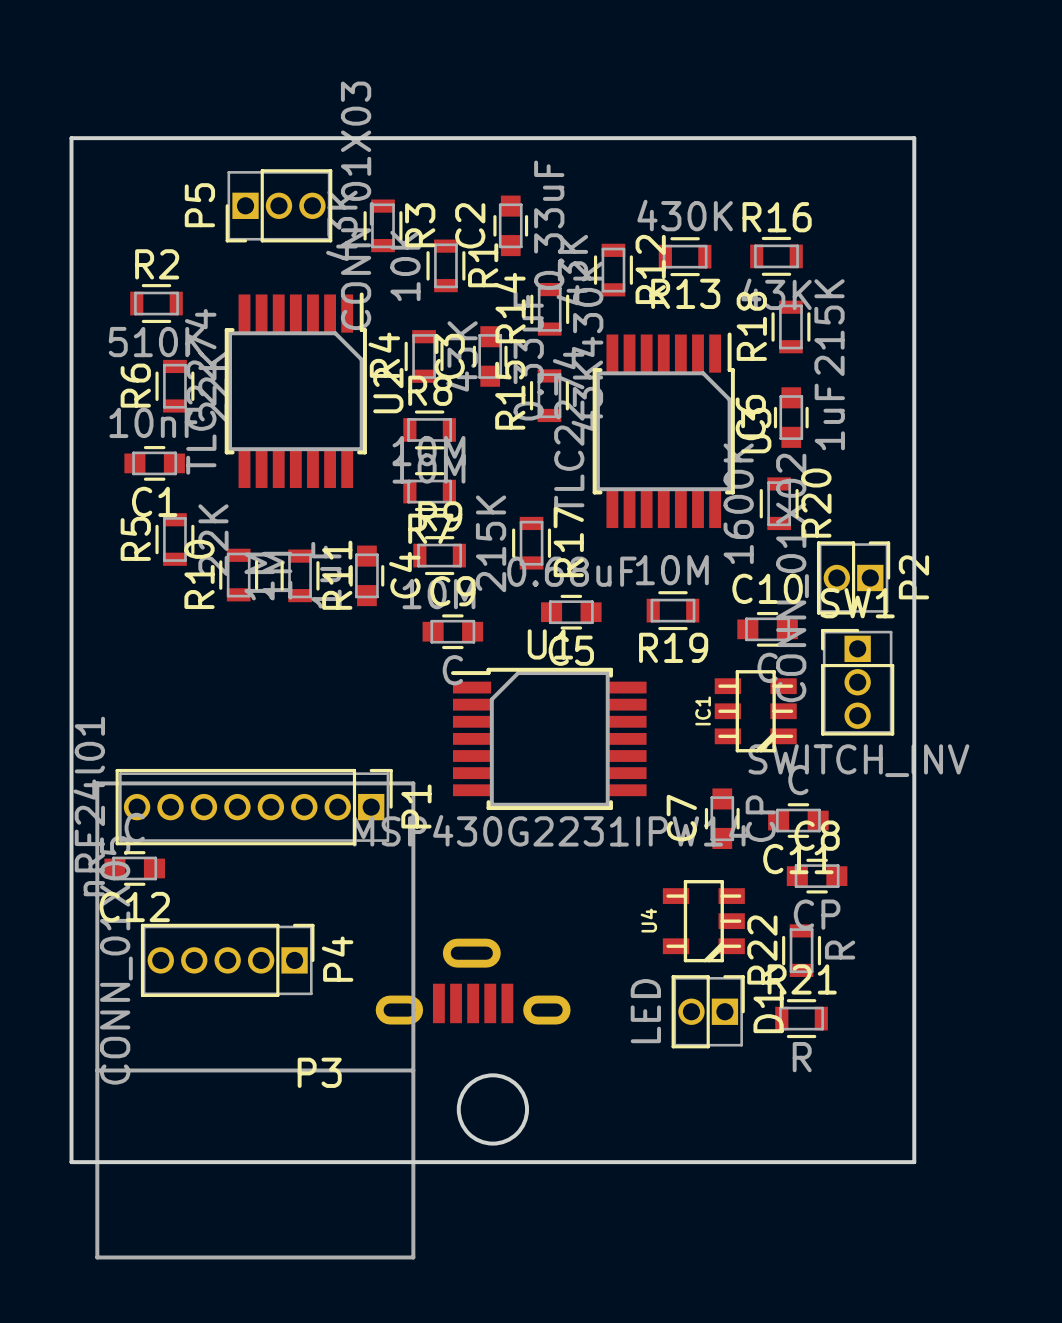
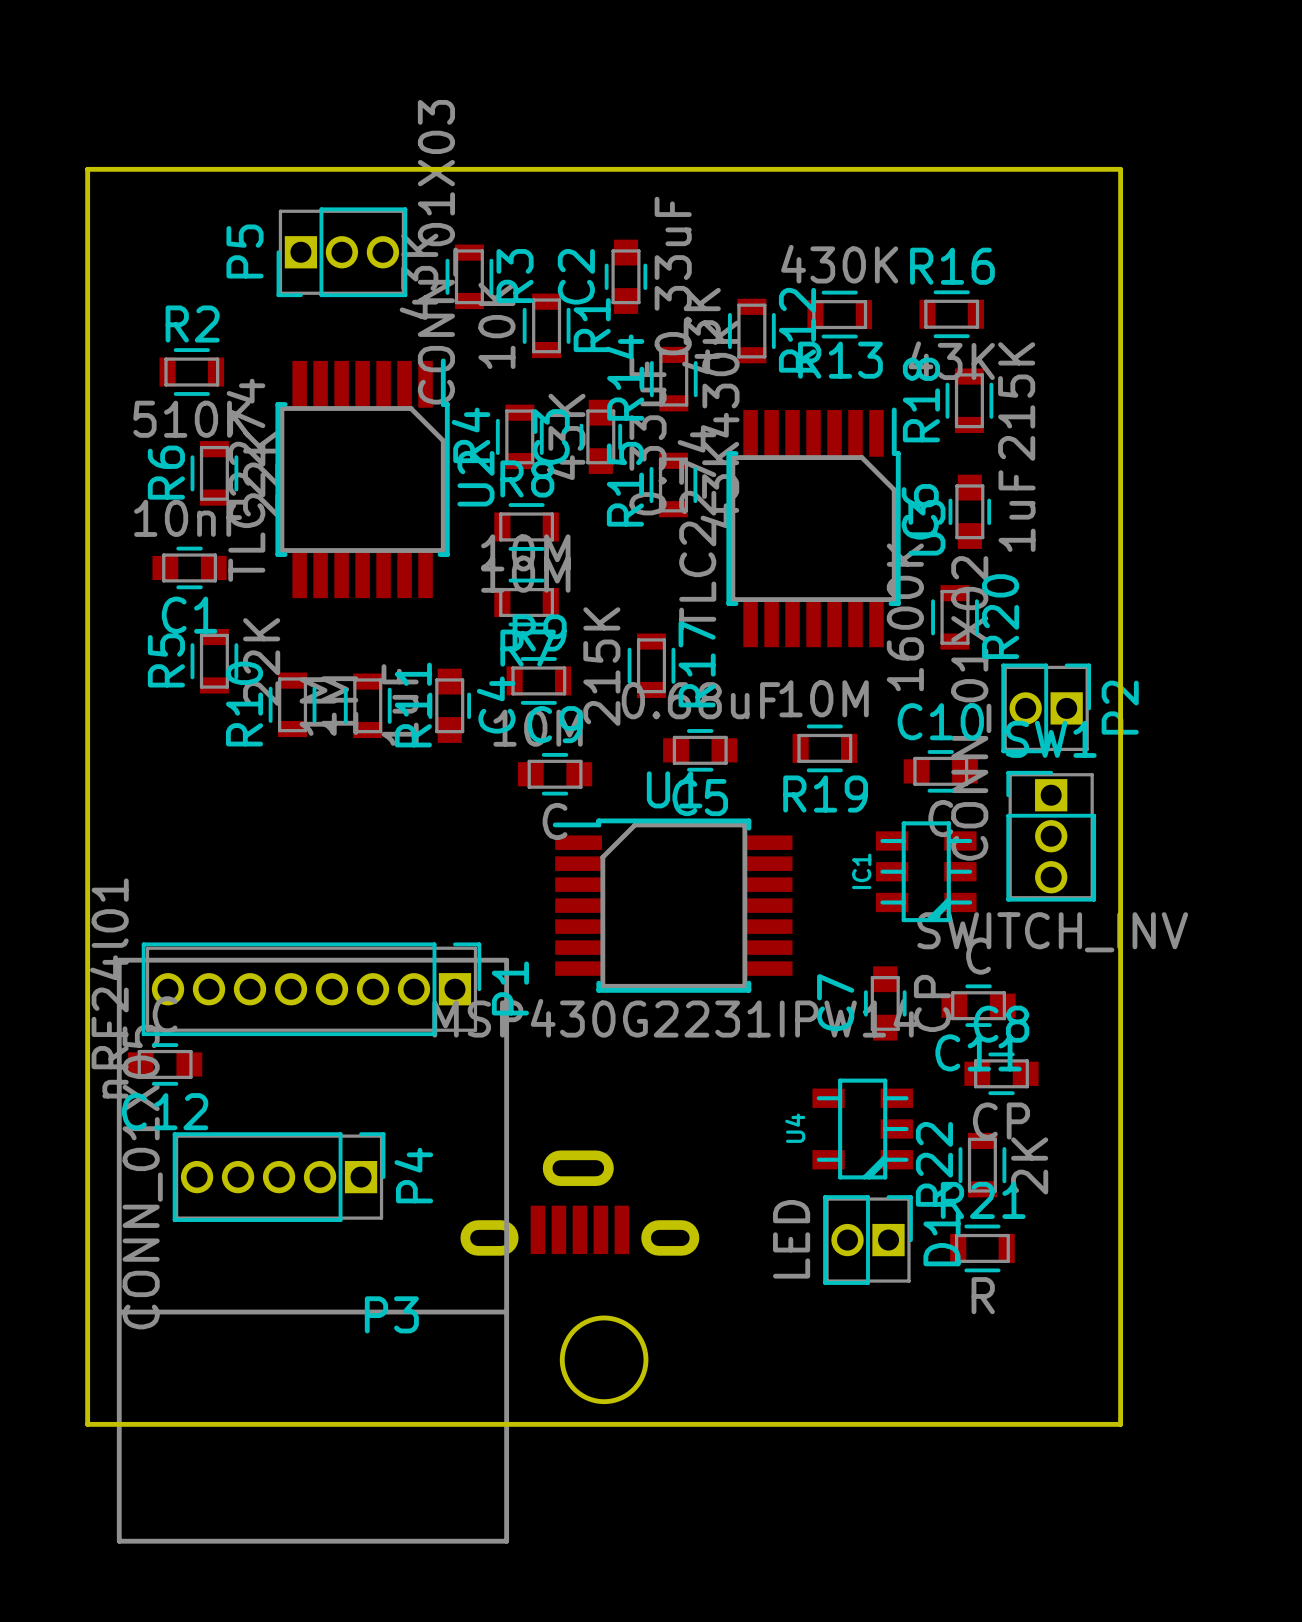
R22 value: R (840, 950) -> 2K (1029, 1165)

